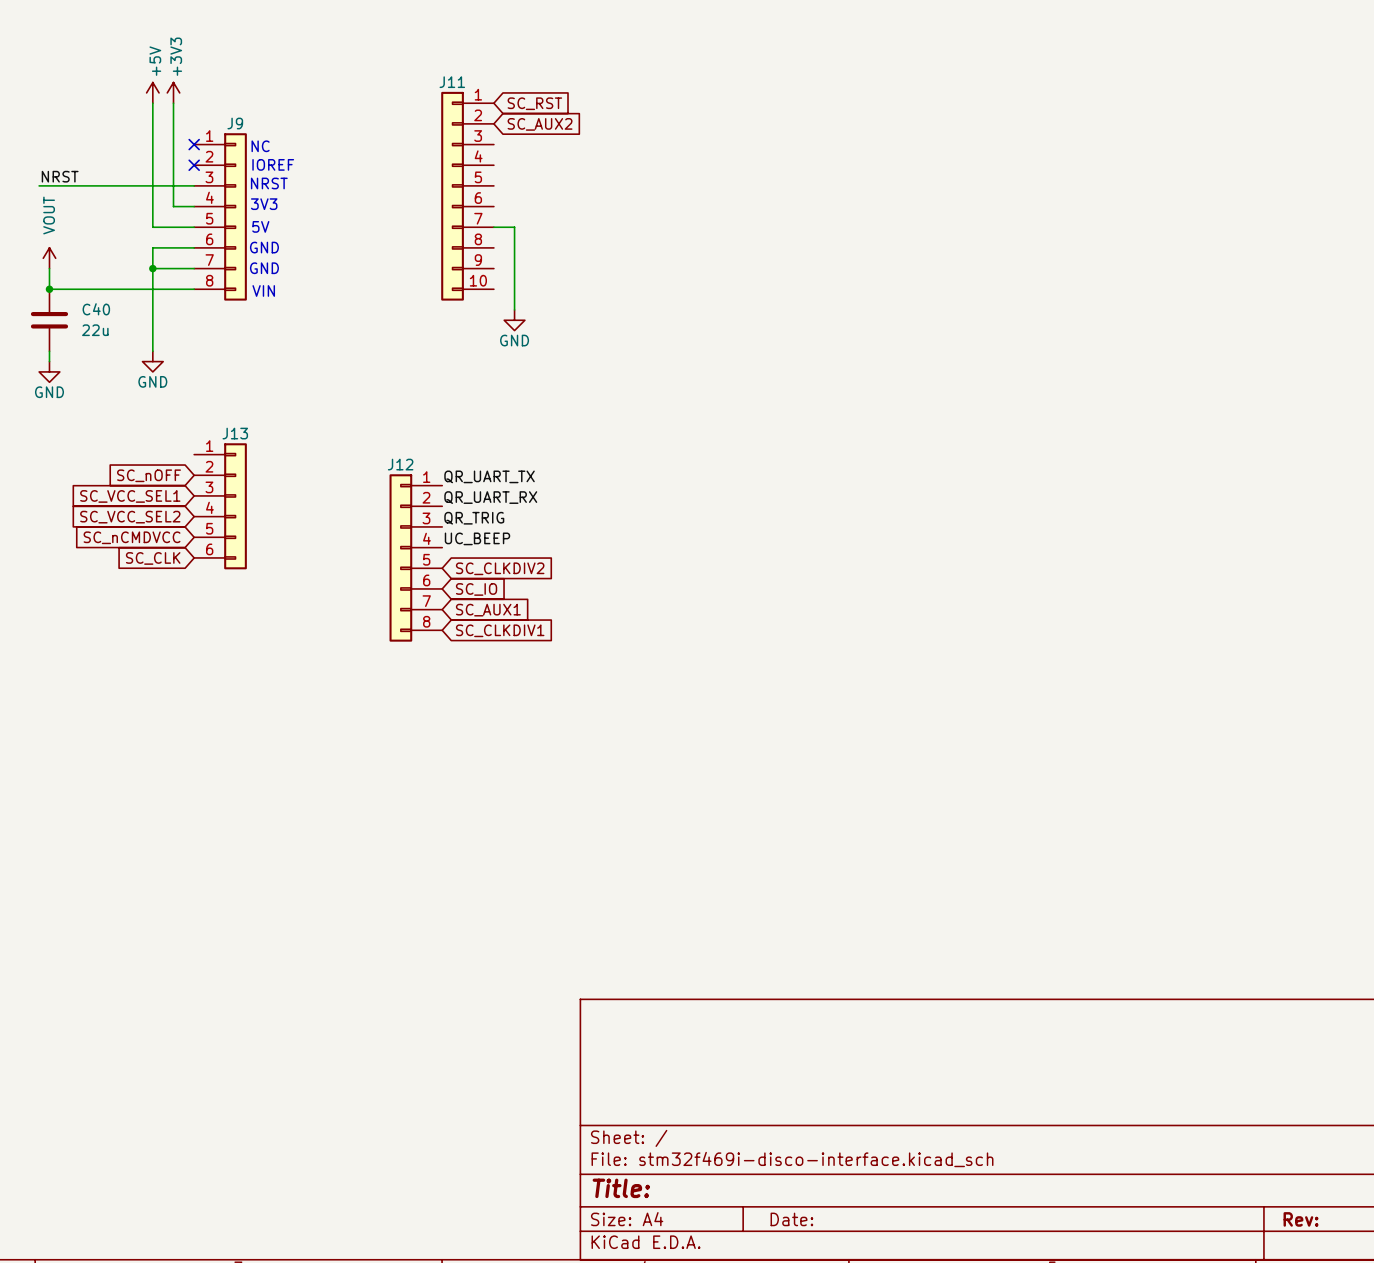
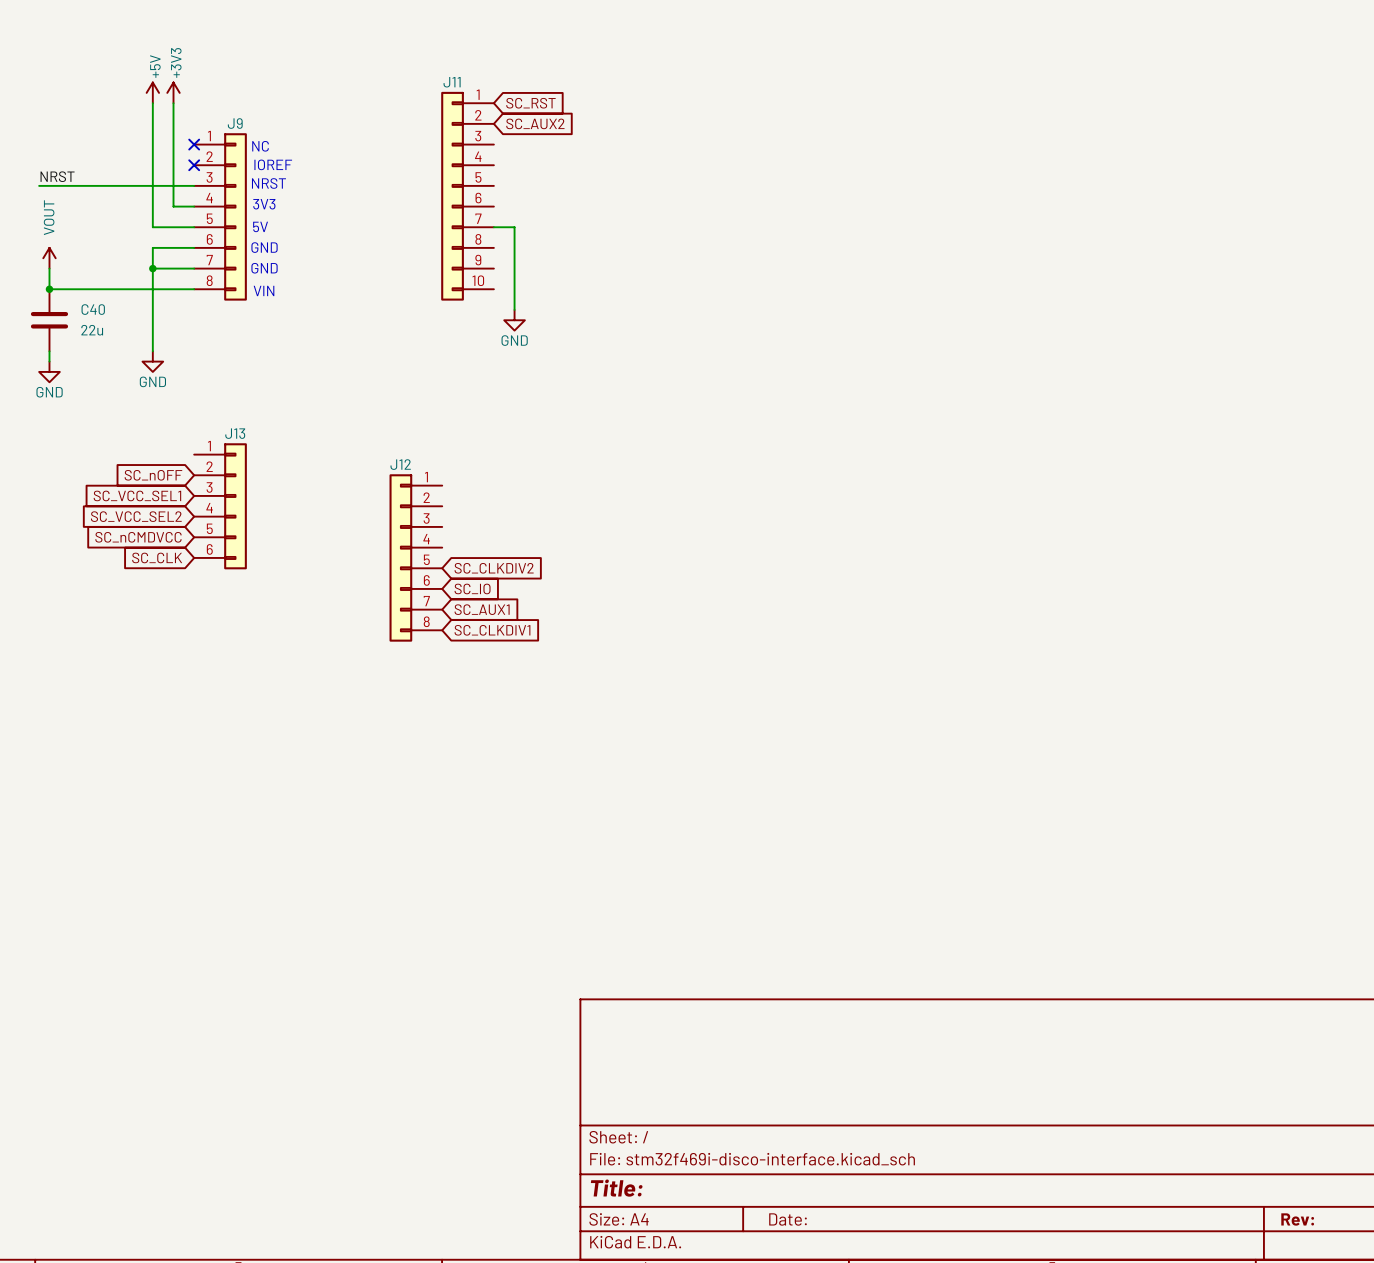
label: QR_UART_TX (489, 476) -> none
label: QR_UART_RX (490, 497) -> none
label: QR_TRIG (474, 518) -> none
label: UC_BEEP (477, 538) -> none

